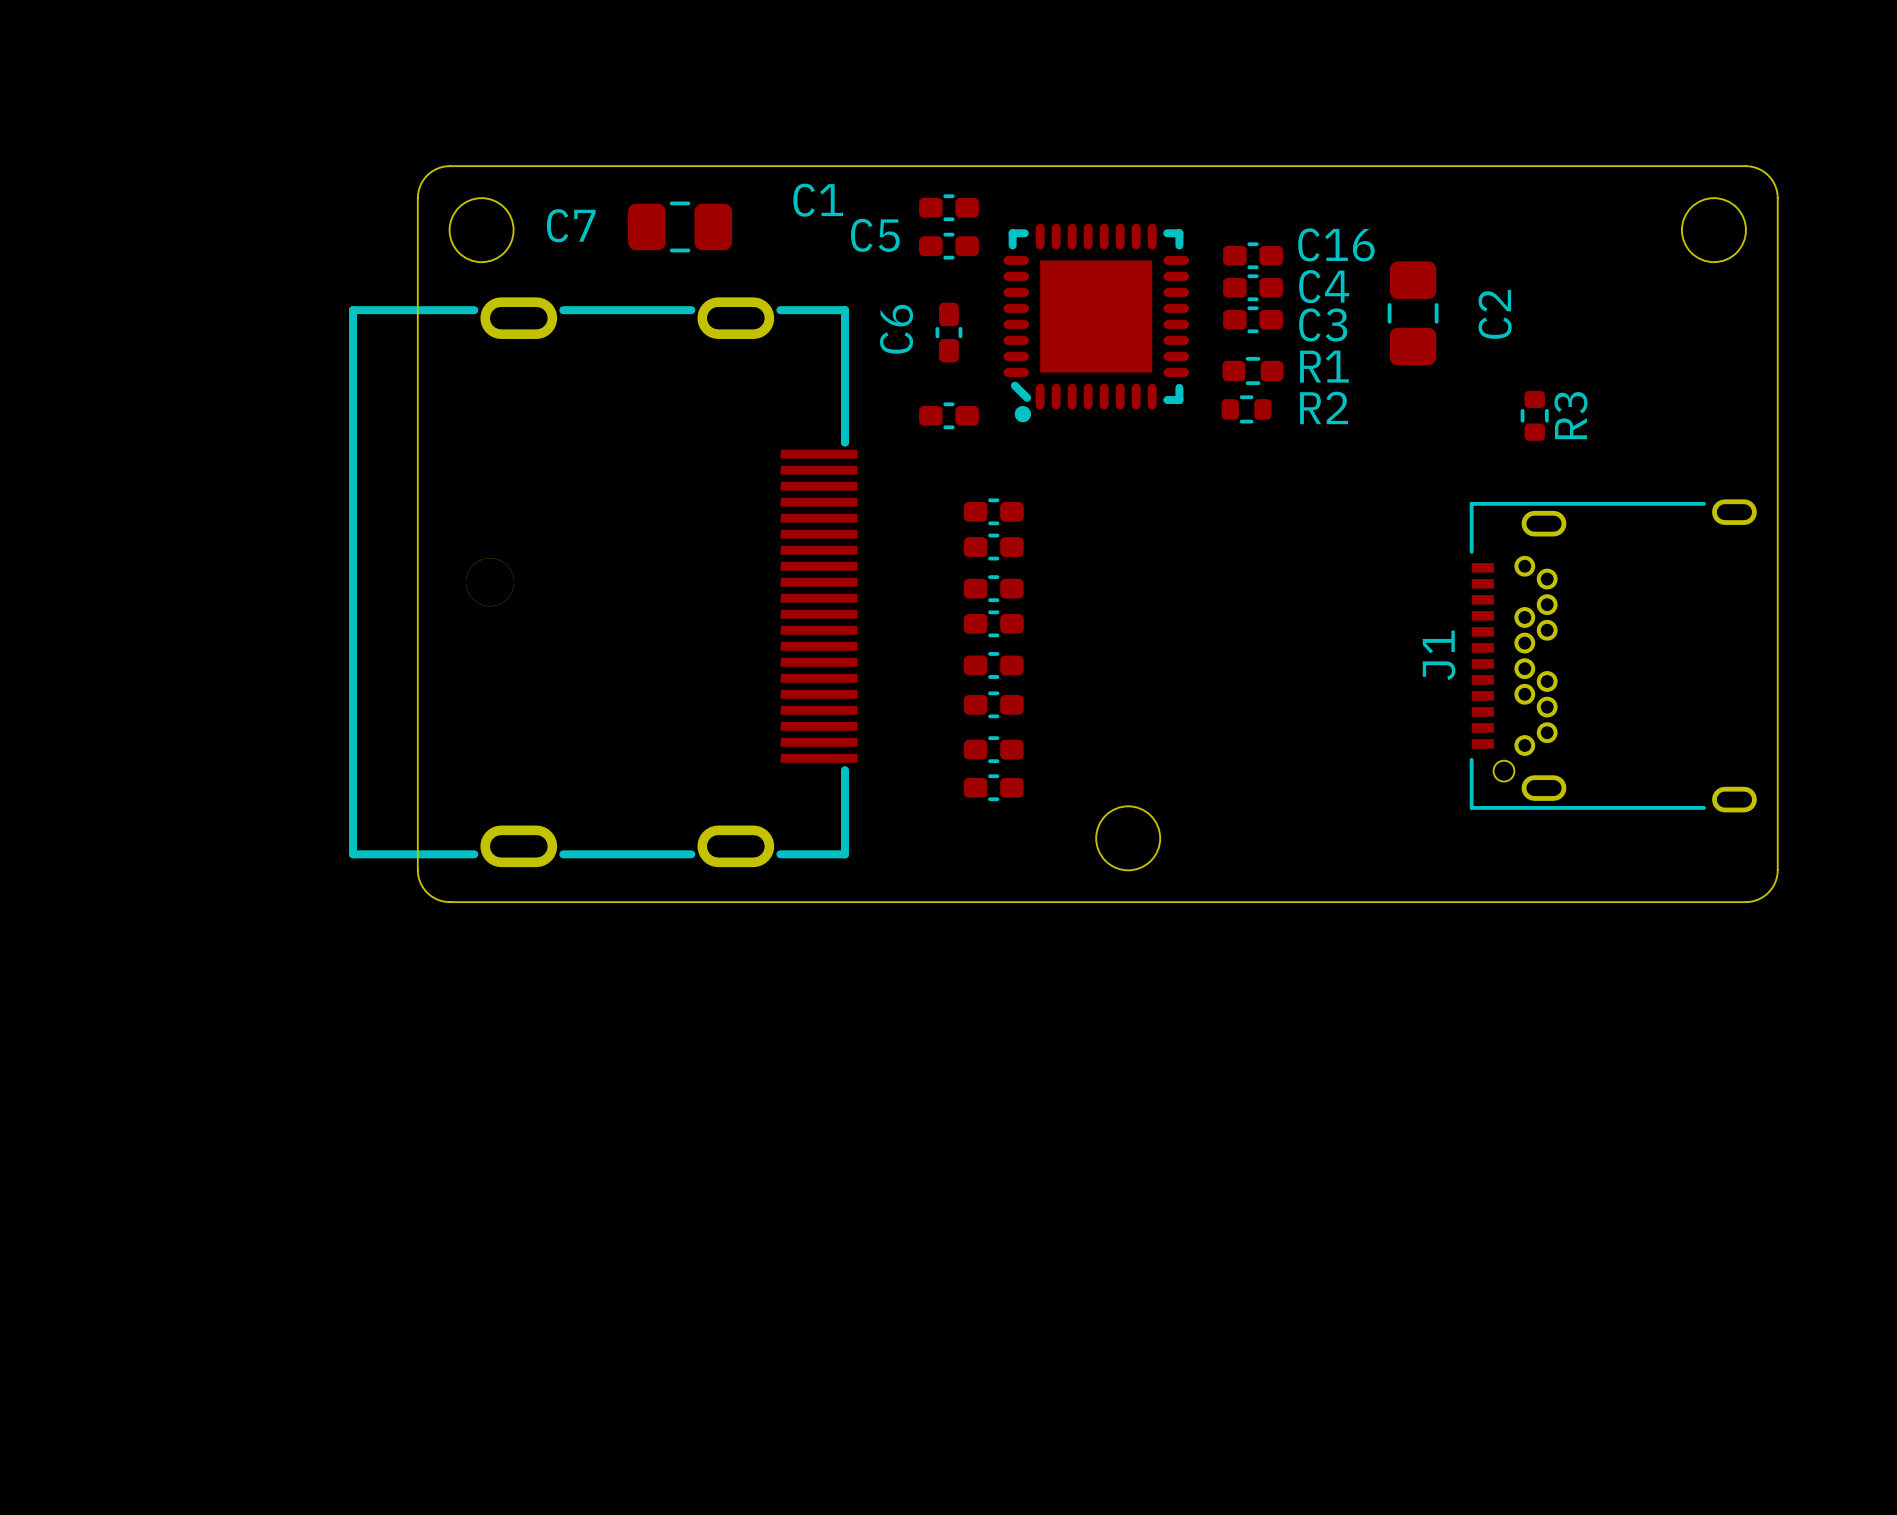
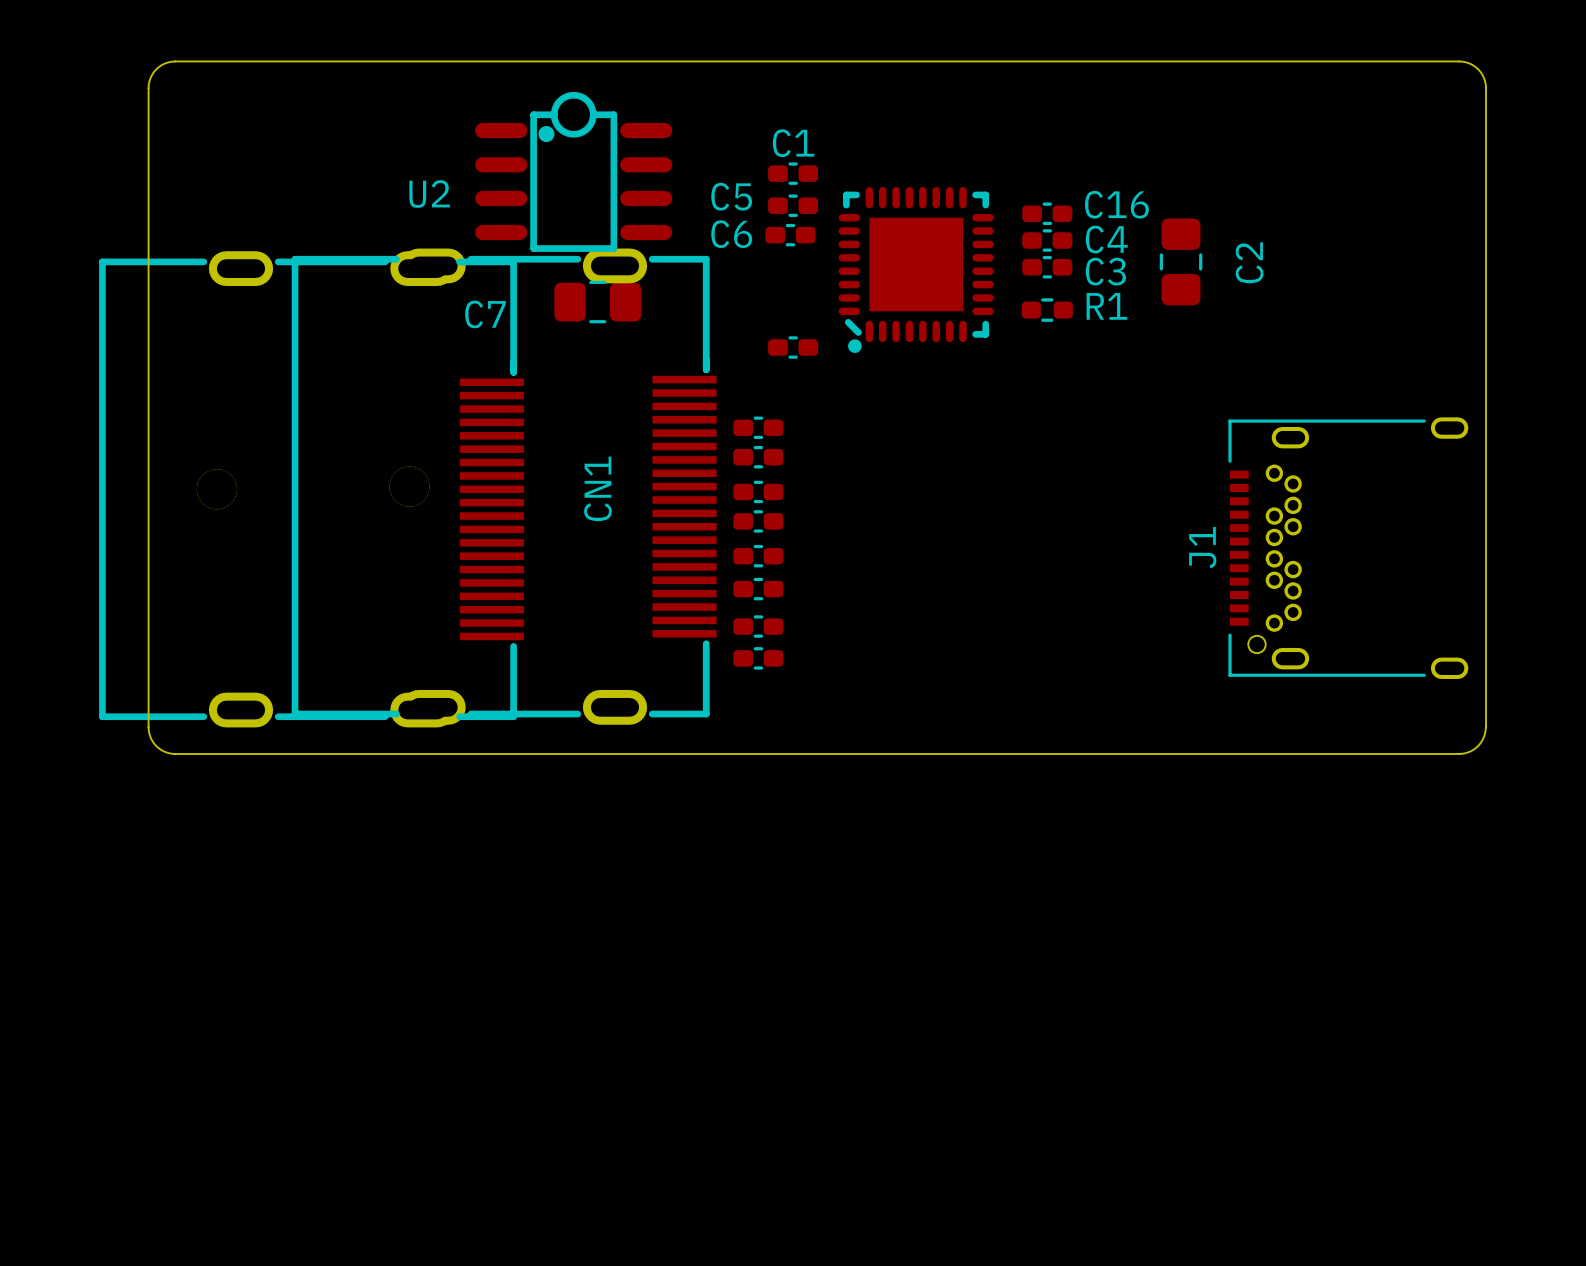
board edge: (1745, 166) (449, 166) (432, 171) (420, 184) (417, 198) (417, 870) (420, 883) (427, 892) (435, 898) (449, 902) -> (1486, 727) (1486, 88) (1481, 73) (1470, 64) (1459, 61) (166, 62) (154, 71) (150, 79) (148, 88) (150, 736) (158, 748) (172, 753) (375, 753)
board edge: (1745, 166) (1757, 168) (1768, 175) (1775, 185) (1777, 198) (1777, 870) -> none
round board edge: [448, 197, 515, 263] -> none
round board edge: [1681, 197, 1747, 263] -> none
C1 name position: C1 (818, 200) -> C1 (793, 143)
U2: none -> (573, 171)
C7 name position: C7 (571, 225) -> C7 (485, 314)
C7 position: (680, 226) -> (597, 302)
C6 rotation: 0° (948, 332) -> 90° clockwise (790, 235)
C6 position: (948, 332) -> (790, 235)
R2: (1246, 409) -> none
R3: (1534, 415) -> none
part: none -> (758, 427)
part: (993, 511) -> none
part: none -> (758, 457)
part: (993, 547) -> none
CN1: none -> (311, 489)
part: none -> (758, 491)
part: (993, 588) -> none
part: none -> (758, 521)
part: (993, 623) -> none
part: none -> (758, 556)
part: (993, 665) -> none
part: none -> (758, 589)
part: (993, 704) -> none
part: none -> (758, 626)
part: (993, 749) -> none
part: none -> (758, 658)
part: (993, 787) -> none
round board edge: [1095, 805, 1162, 872] -> none

